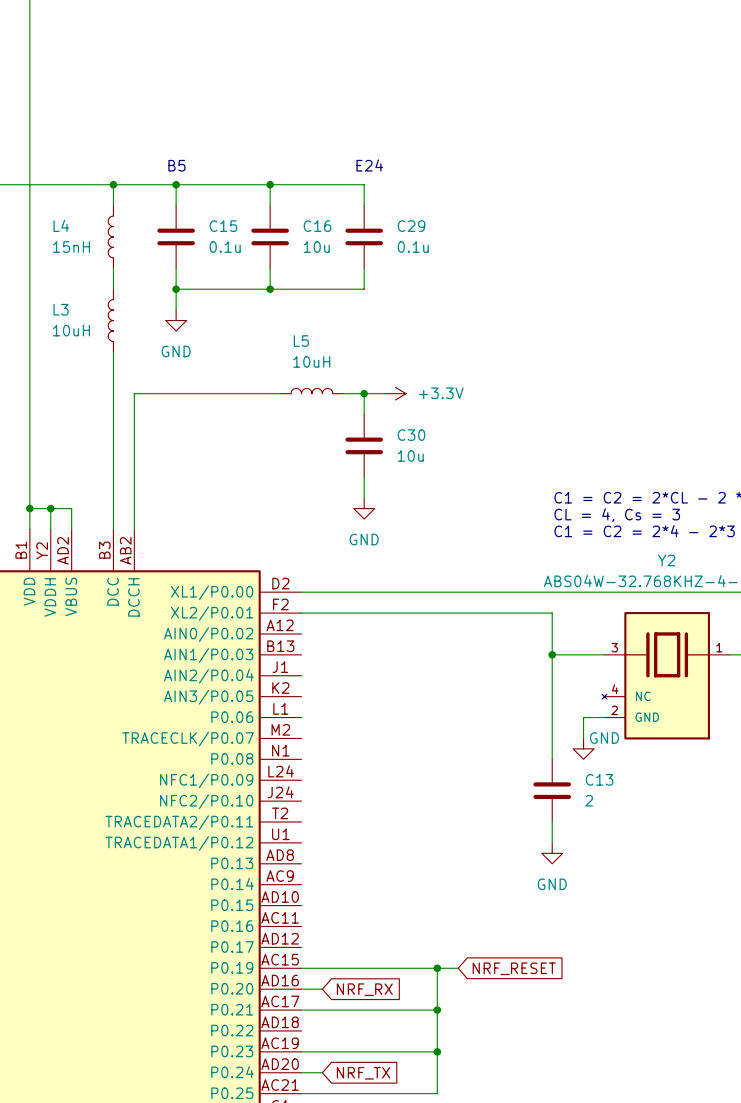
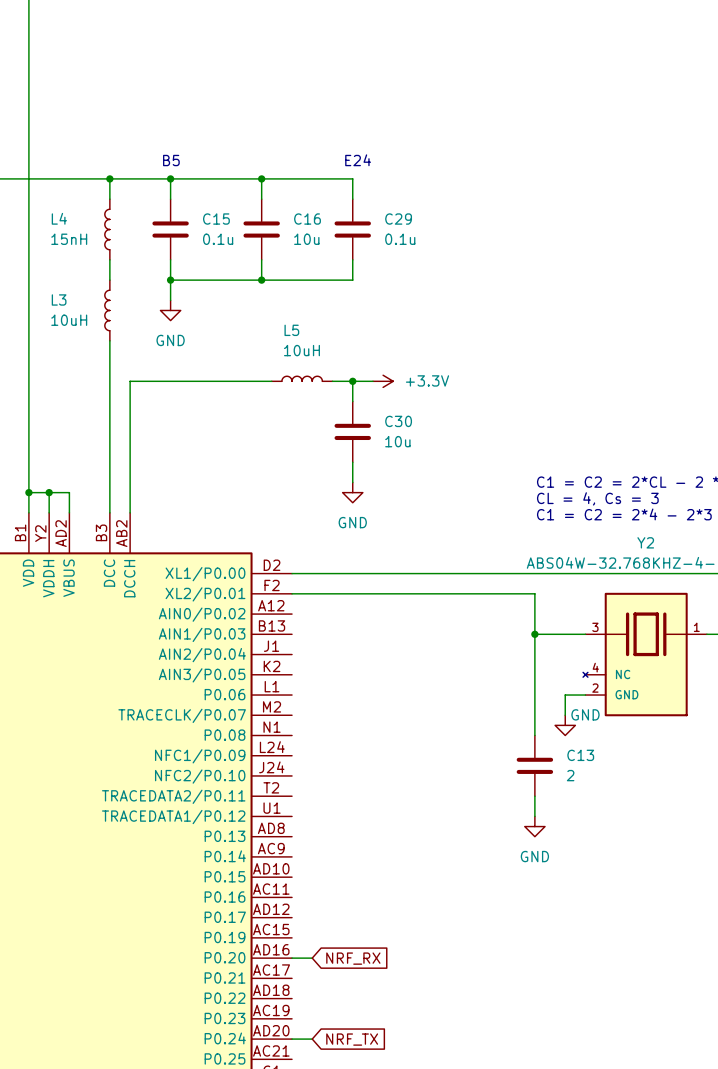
wire: (301, 968) (458, 968) -> none
wire: (437, 968) (437, 1093) (301, 1093) -> none
junction: (437, 968) -> none
global label: NRF_RESET (514, 968) -> none
wire: (301, 1010) (437, 1010) -> none
junction: (437, 1010) -> none
wire: (301, 1051) (437, 1051) -> none
junction: (437, 1051) -> none

